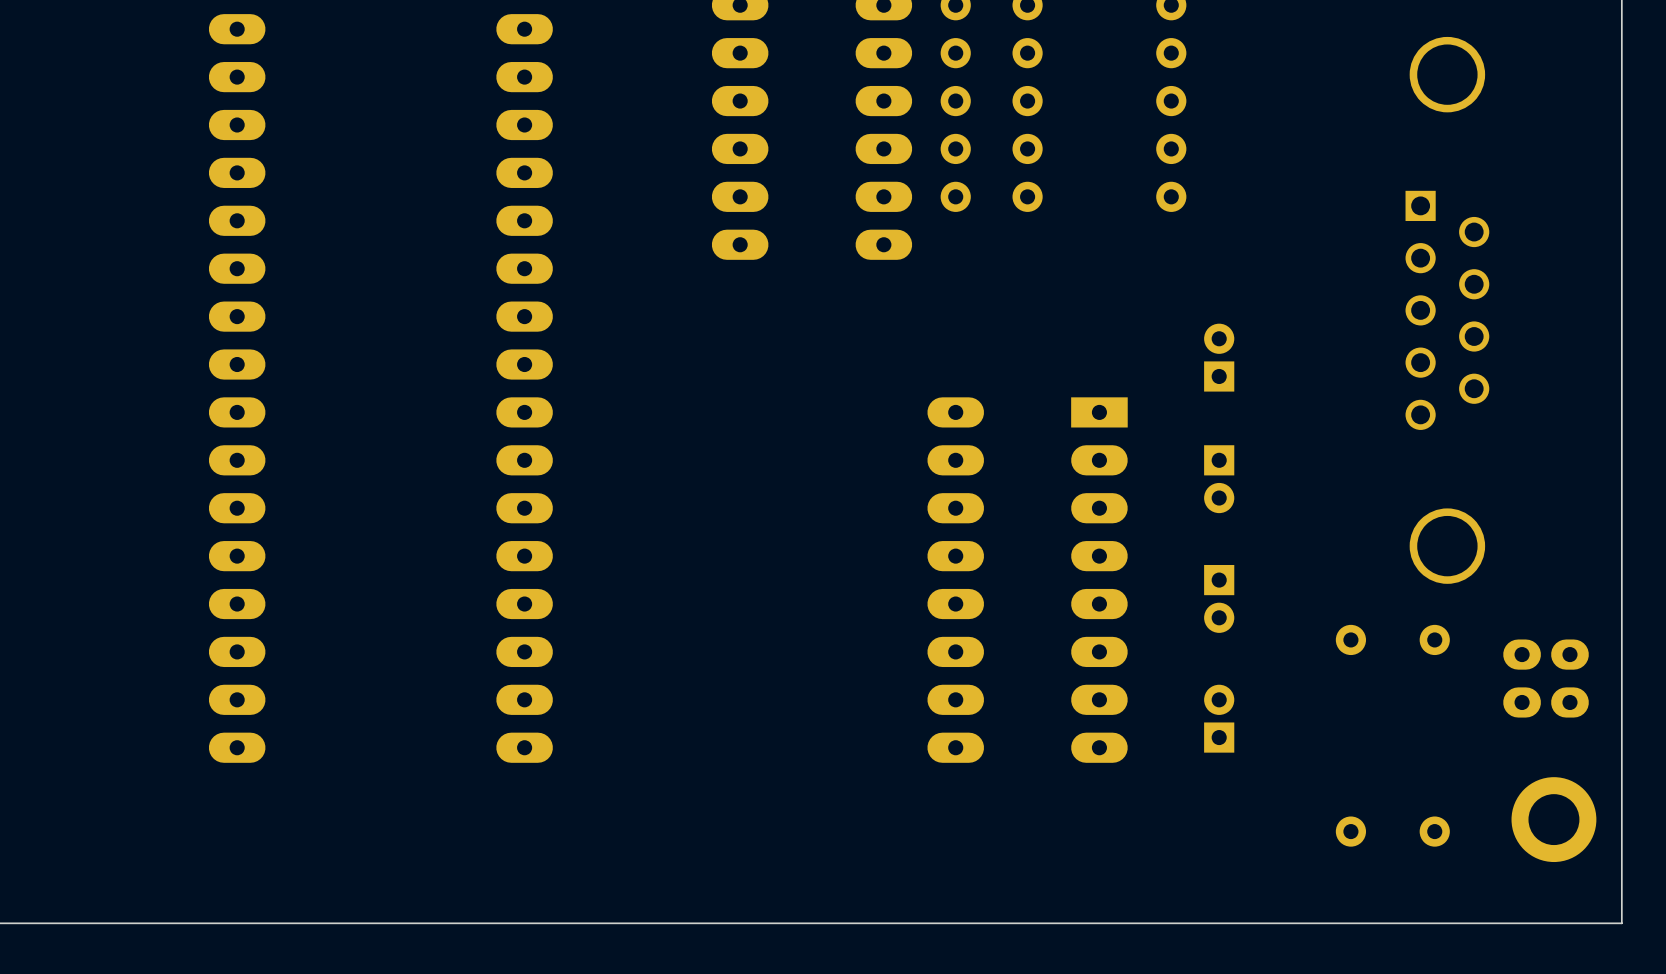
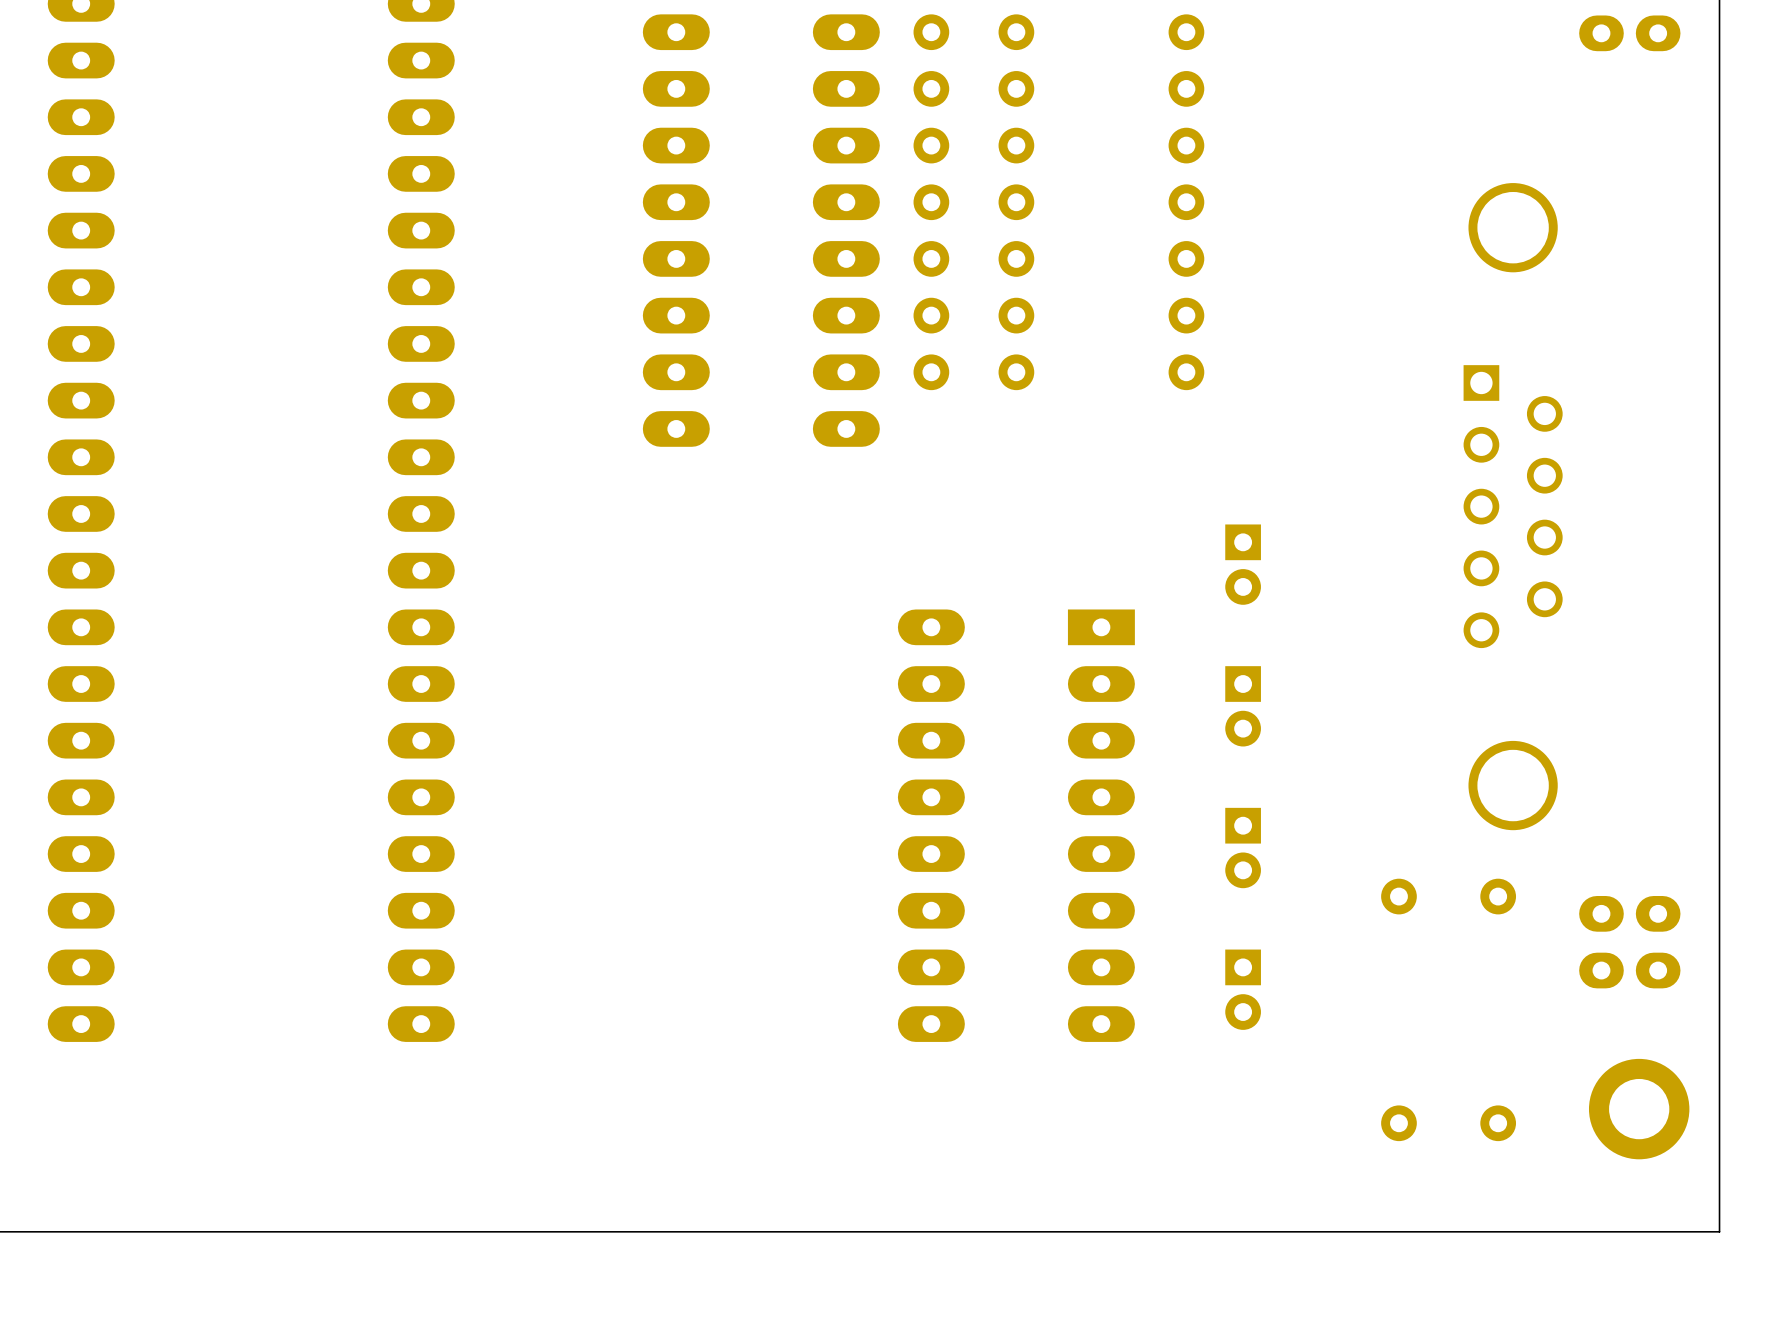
part rotation: 0° (1219, 357) -> 180° (1243, 564)
part rotation: 0° (1219, 718) -> 180° (1243, 989)

